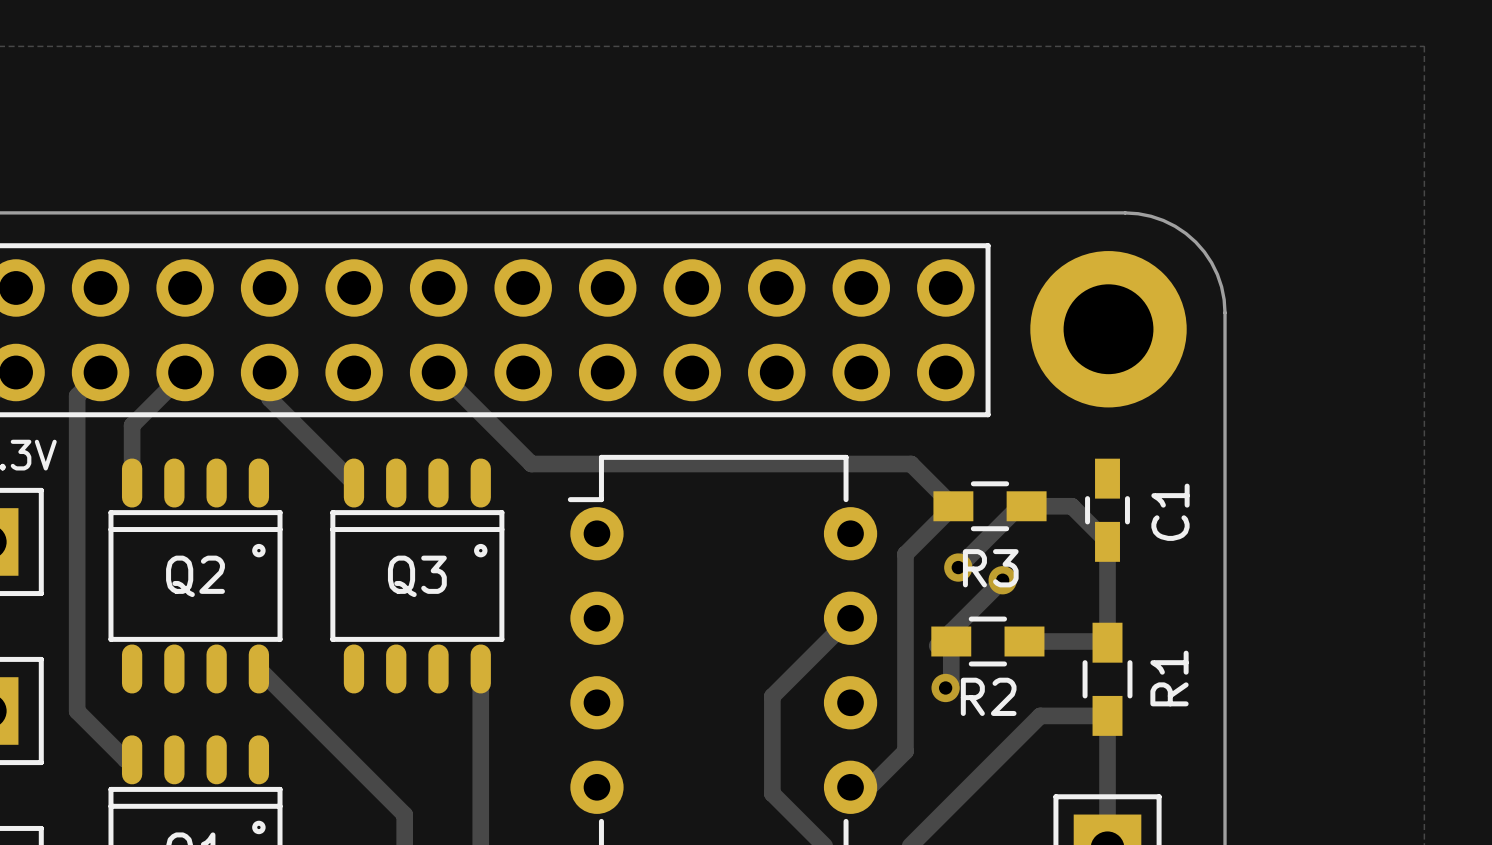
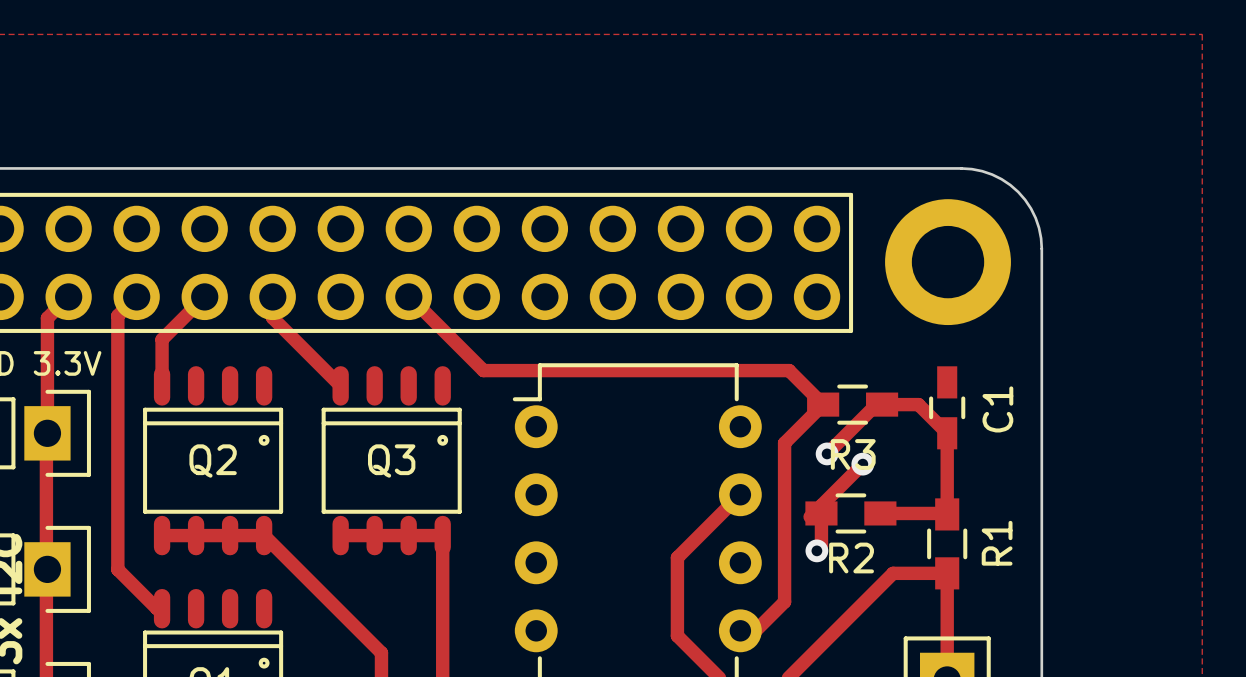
track: none -> (441, 533) (442, 535) (340, 535)
track: none -> (162, 535) (264, 535)

